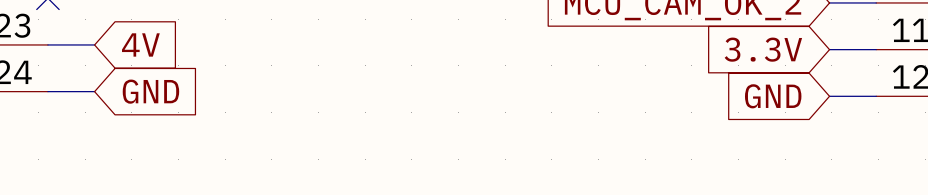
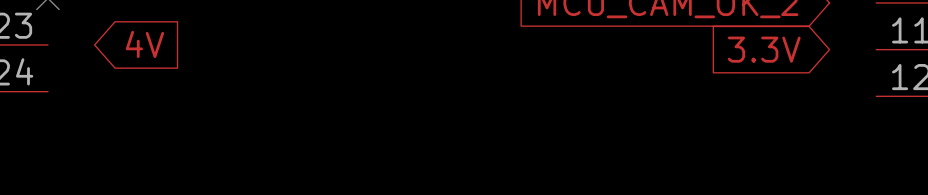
wire: (829, 2) (876, 2) -> none
wire: (47, 44) (94, 44) -> none
wire: (829, 49) (876, 49) -> none
wire: (47, 91) (94, 91) -> none
global label: GND (150, 91) -> none
global label: GND (773, 96) -> none
wire: (829, 96) (876, 96) -> none

